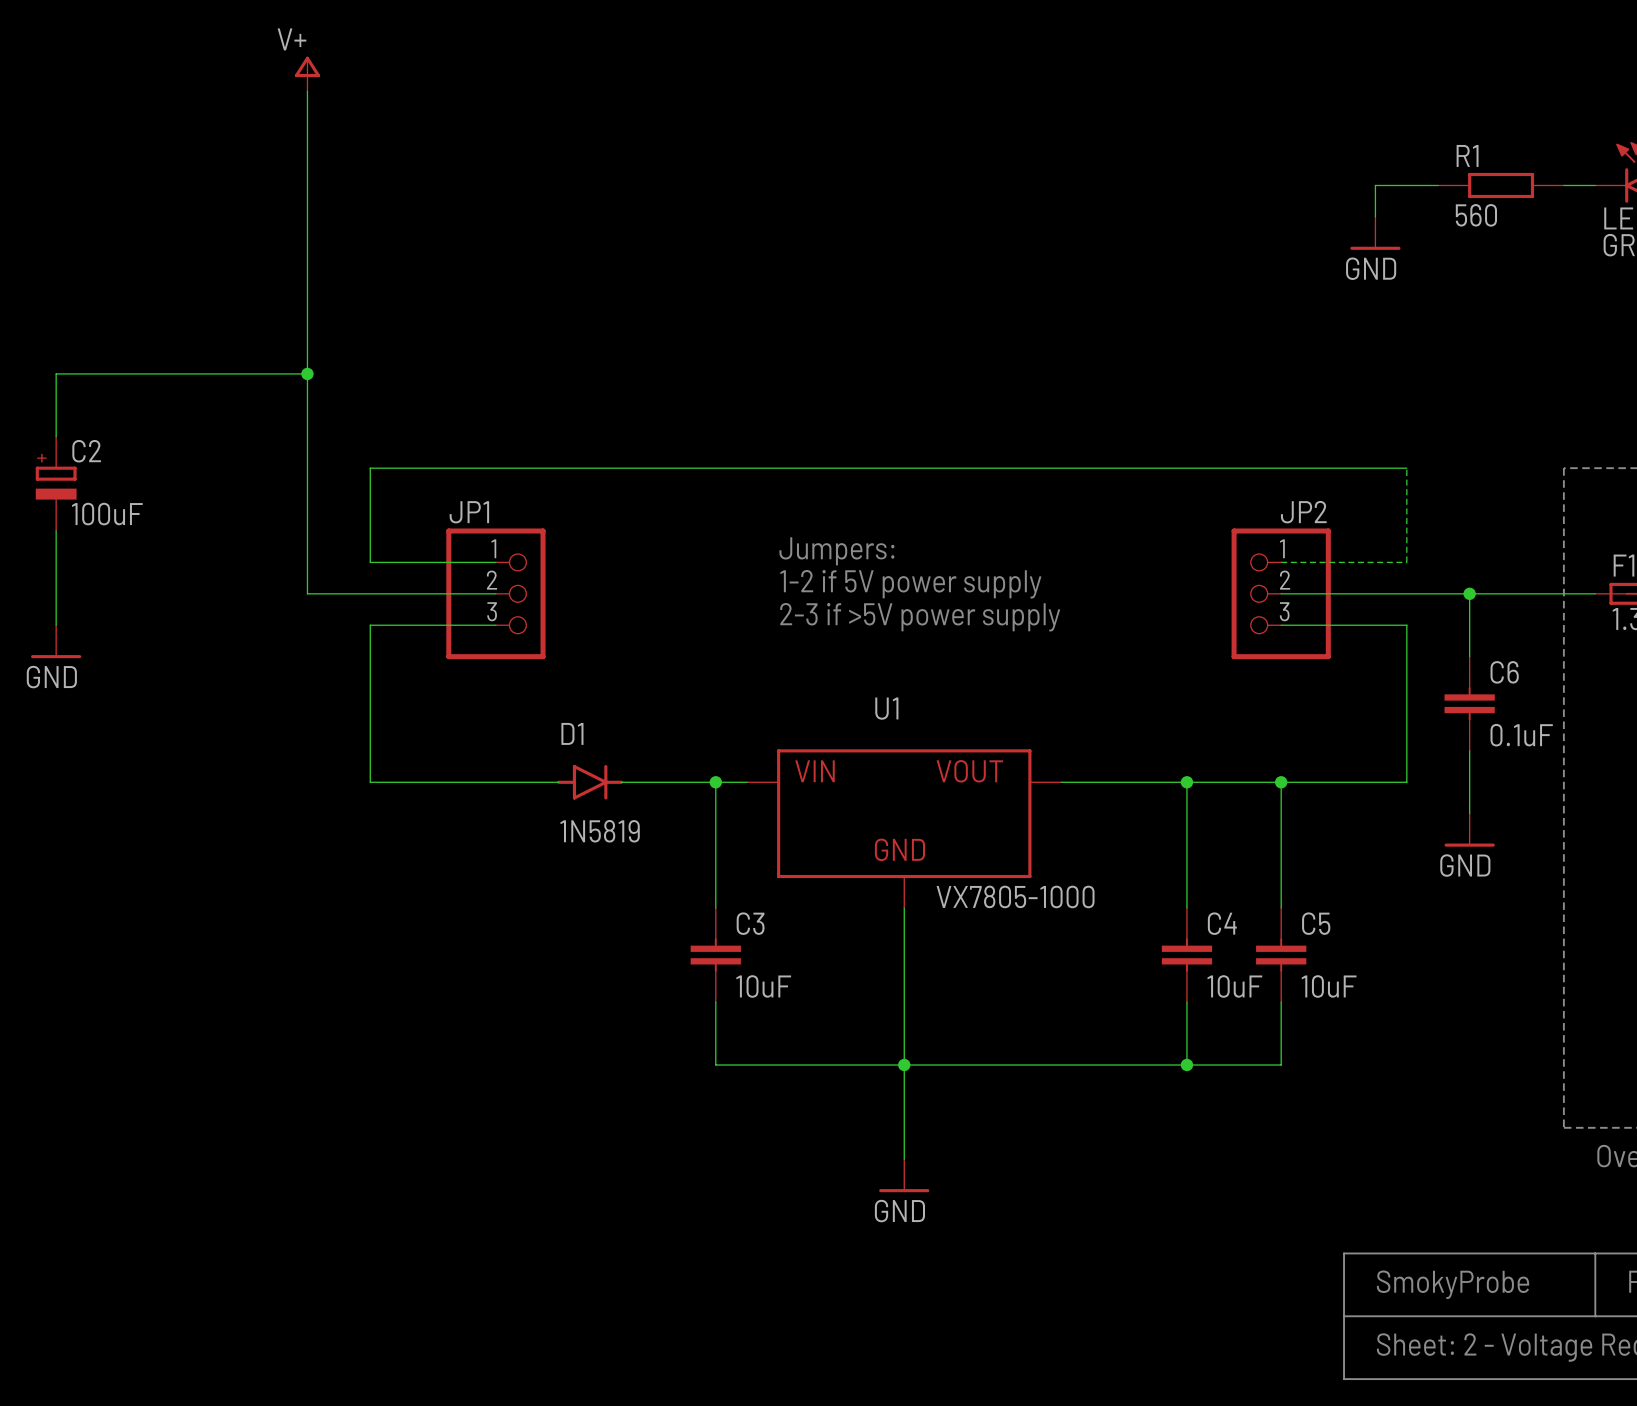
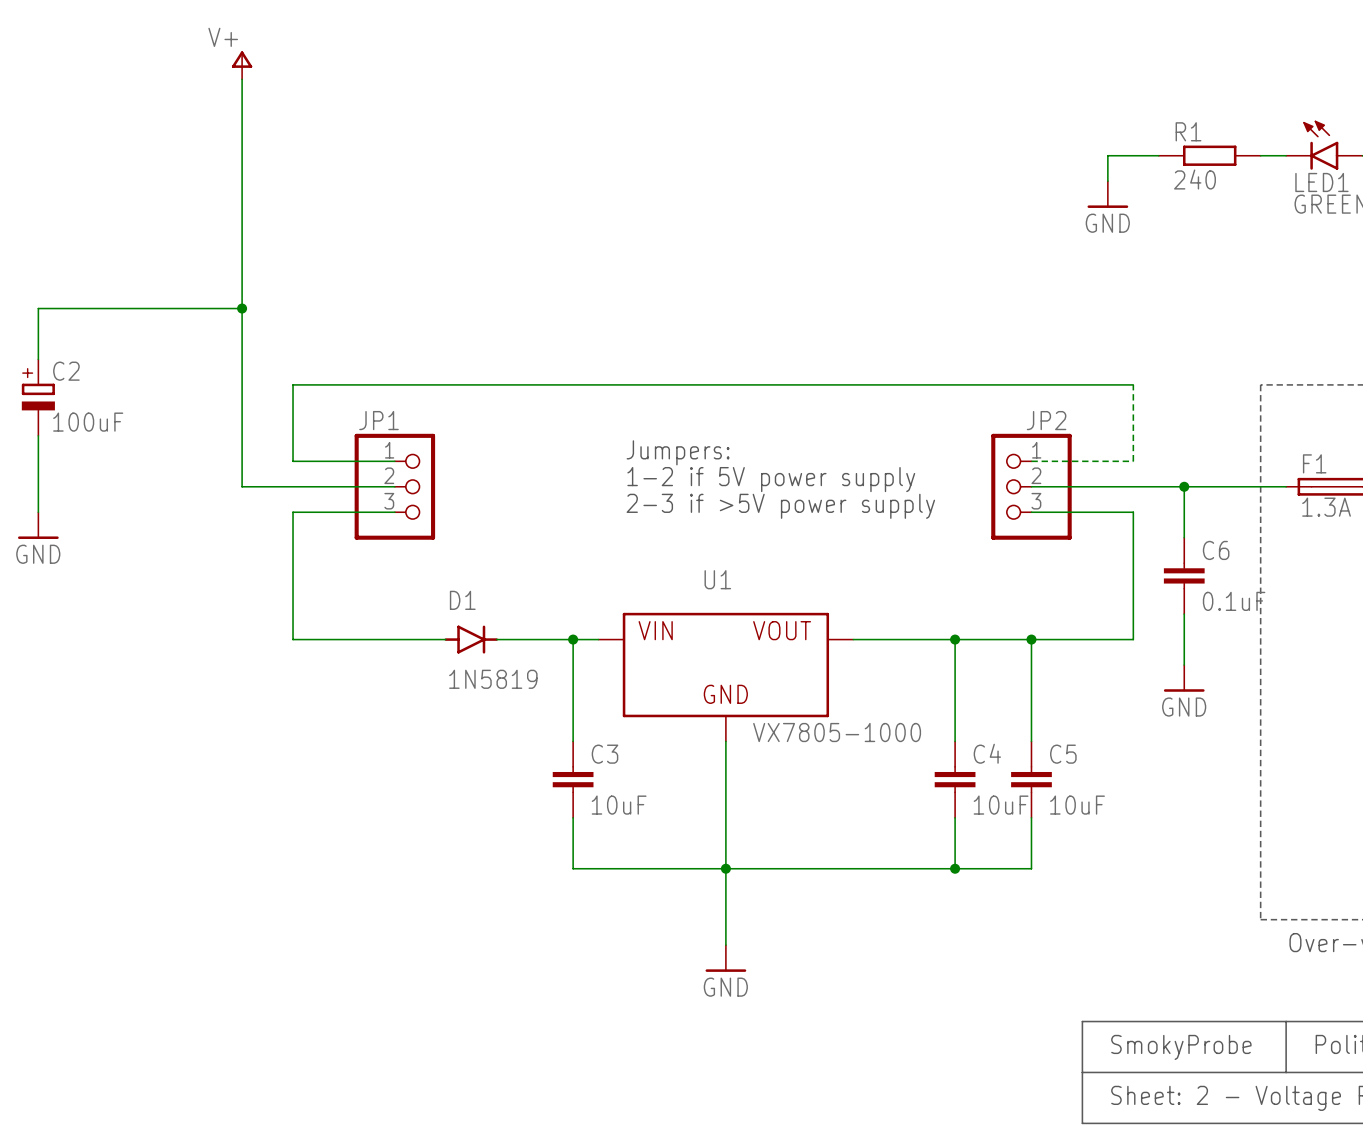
R1 value: 560 (1476, 215) -> 240 (1195, 179)

